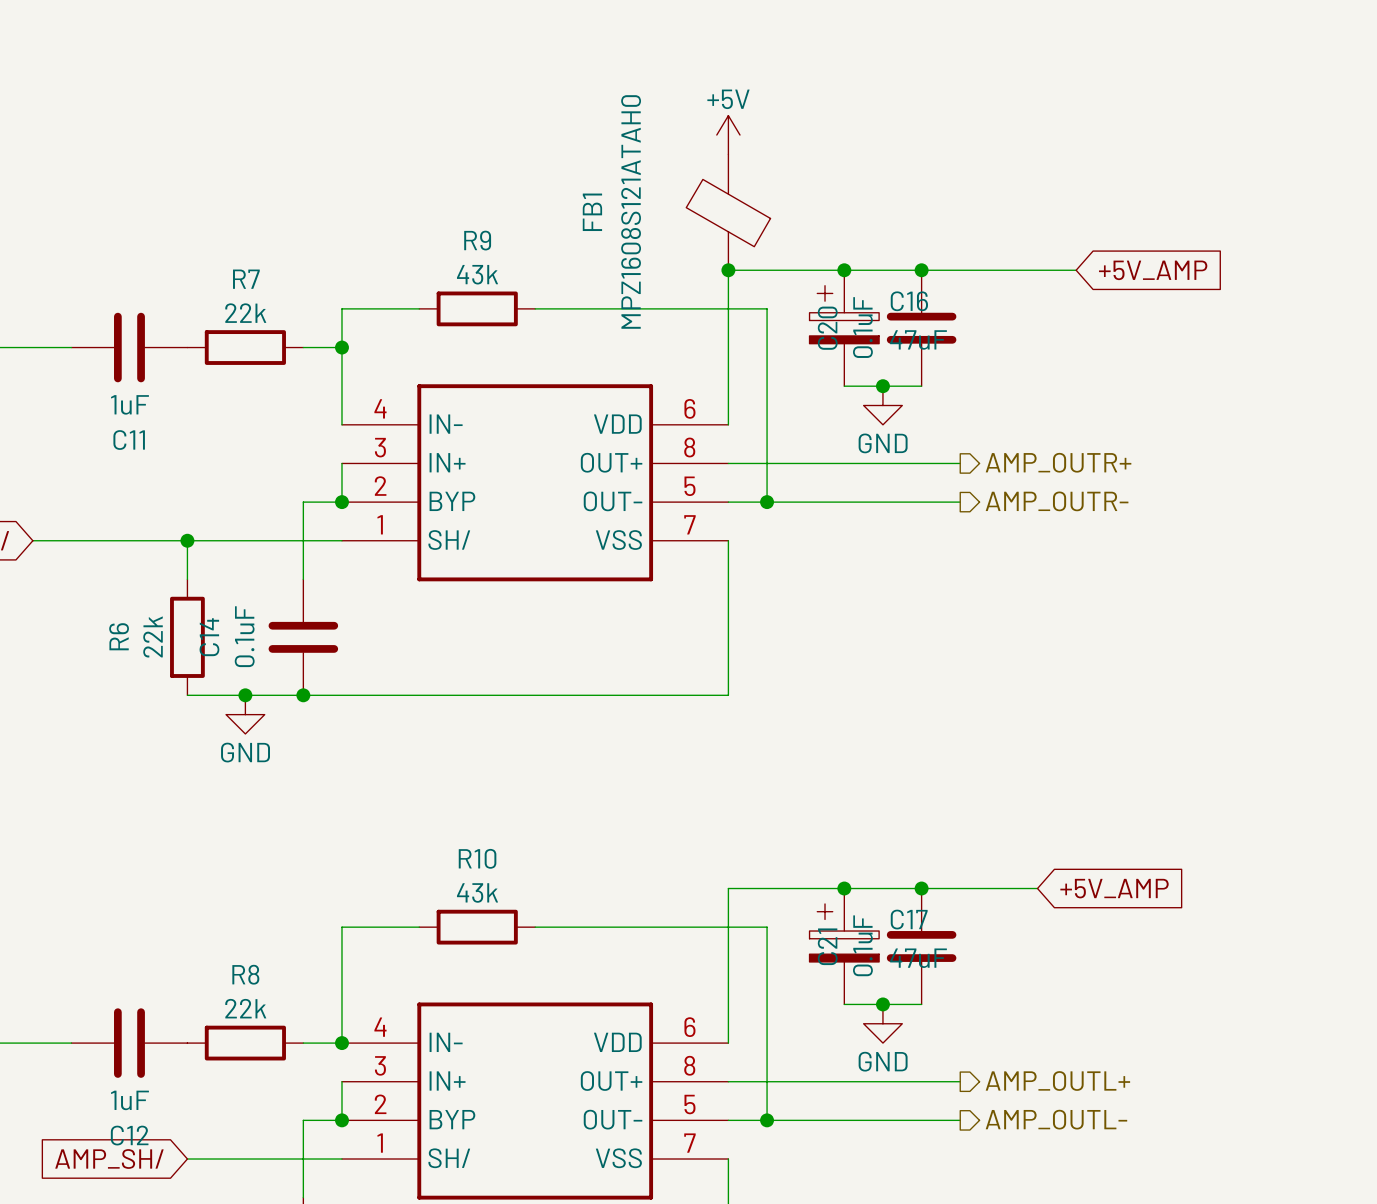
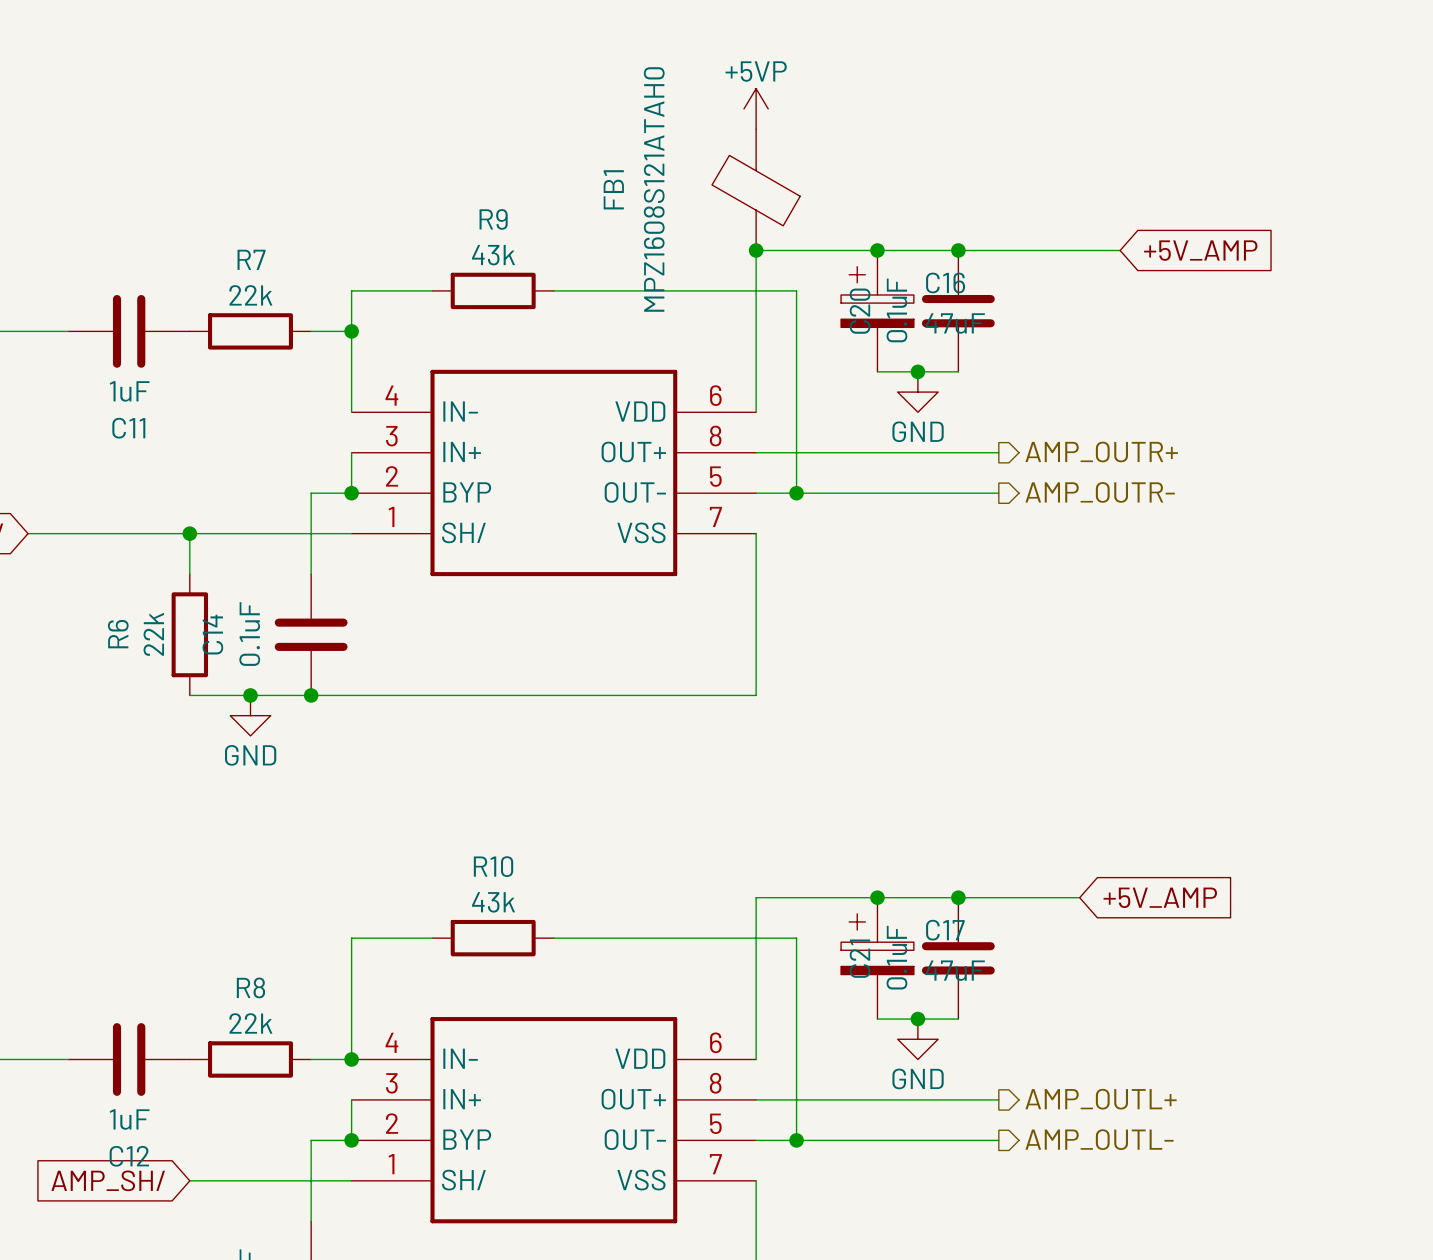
power symbol: +5V (728, 135) -> +5VP (756, 108)

